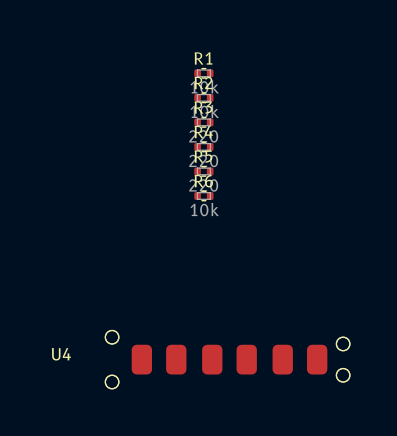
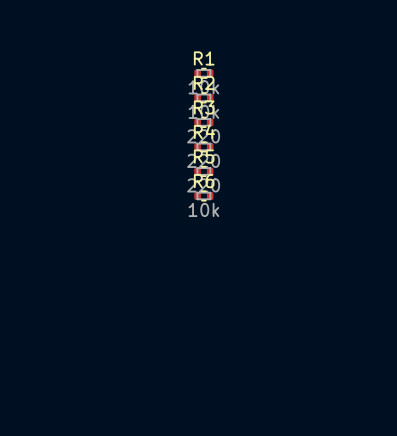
U4: (227, 359) -> none

